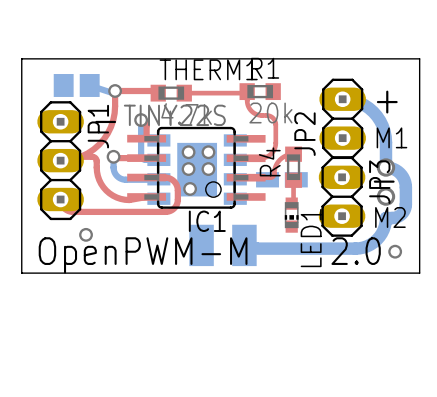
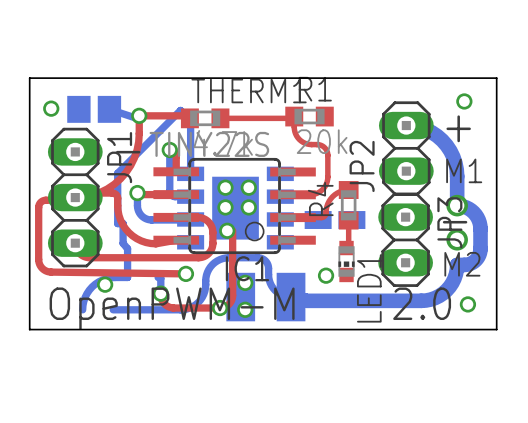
via: none -> (464, 101)
via: none -> (51, 108)
bottom track: none -> (190, 173) (190, 120) (180, 110) (117, 173) (117, 223) (123, 223) (123, 243) (127, 248) (127, 277) (106, 278) (95, 284) (87, 293) (82, 309)
top track: none -> (75, 197) (72, 200) (44, 200) (39, 204) (38, 261) (43, 269) (51, 272) (185, 273)
top track: none -> (232, 230) (232, 297) (227, 305) (220, 308) (171, 307) (163, 302) (160, 293)
via: none -> (185, 273)
via: none -> (326, 275)
bottom track: none -> (158, 277) (160, 278) (160, 293)
via: none -> (245, 282)
via: none -> (160, 293)
bottom track: none -> (291, 297) (282, 295) (273, 288) (269, 280) (267, 264) (263, 259) (226, 257) (217, 260) (210, 266) (206, 275) (202, 297) (190, 307) (180, 309) (113, 309)
via: none -> (220, 308)
via: none -> (245, 309)

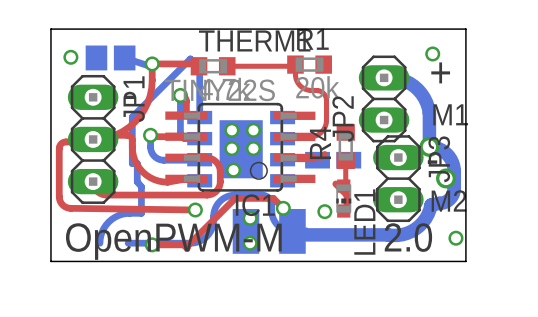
board edge: (478, 78) (496, 78) (496, 329) (478, 329) -> (465, 29) (465, 261)
via position: (464, 101) -> (432, 53)
bottom track: (406, 125) (419, 127) (431, 132) (442, 140) (450, 150) (456, 169) (457, 205) (468, 208) (477, 217) (480, 225) (480, 250) (477, 258) (472, 262) (457, 264) (452, 282) (439, 296) (425, 300) (394, 300) -> (384, 77) (404, 80) (421, 93) (429, 113) (429, 146) (438, 148) (447, 154) (452, 162) (454, 171) (454, 190) (449, 198) (443, 202) (431, 205) (425, 218) (411, 231) (397, 235) (387, 234)
JP2 position: (406, 148) -> (384, 98)
top track: (348, 190) (340, 191) (332, 196) (327, 203) (326, 212) -> none
via position: (457, 205) -> (429, 146)
top track: (232, 230) (232, 297) (227, 305) (220, 308) (171, 307) (163, 302) (160, 293) -> none
top track: none -> (335, 183) (347, 195) (347, 212)
top track: none -> (283, 208) (273, 198) (235, 198) (187, 248) (183, 244) (152, 244)
via: none -> (283, 208)
bottom track: (158, 277) (160, 278) (160, 293) -> none
via: (105, 284) -> none
via: (160, 293) -> none
via: (220, 308) -> none
via: none -> (152, 244)

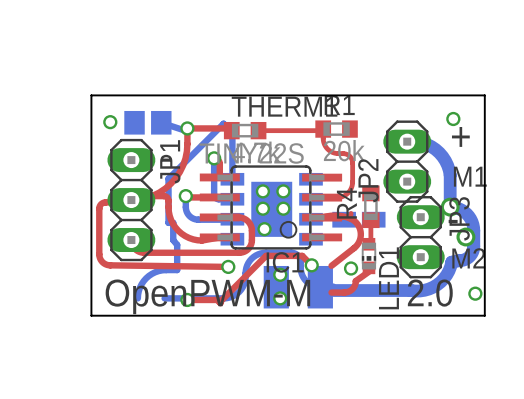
top track: none -> (322, 218) (335, 215) (349, 218) (357, 224) (360, 231) (357, 245) (331, 265)
top track: (335, 183) (347, 195) (347, 212) -> (331, 292) (350, 291) (354, 286) (355, 281) (372, 269)

